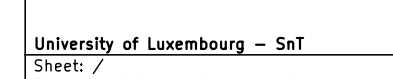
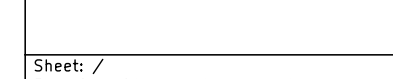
title block: University of Luxembourg - SnT (169, 45) -> none

